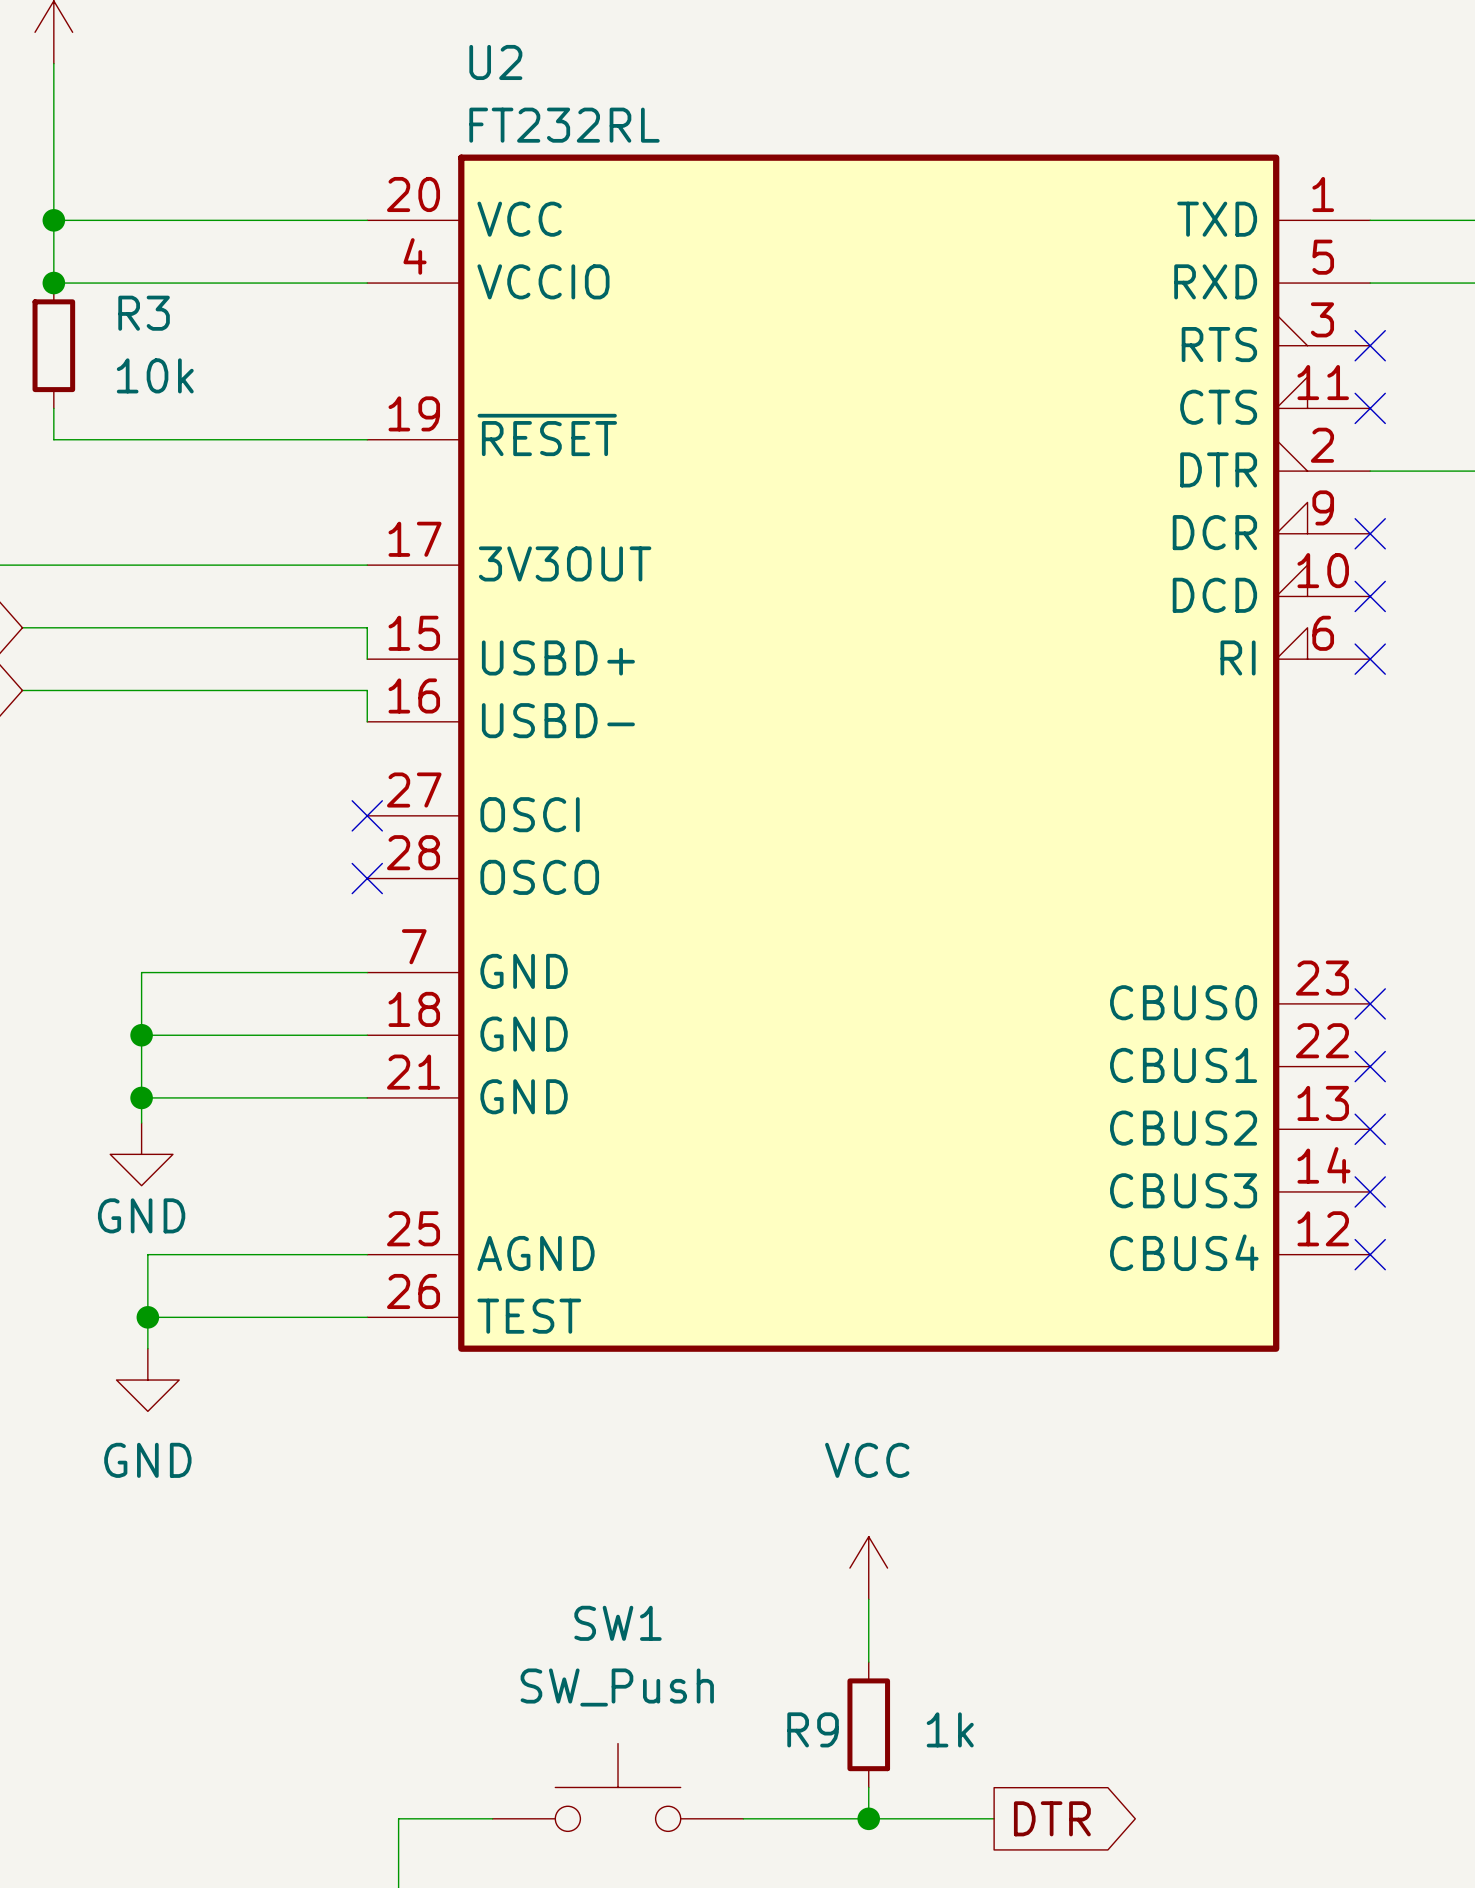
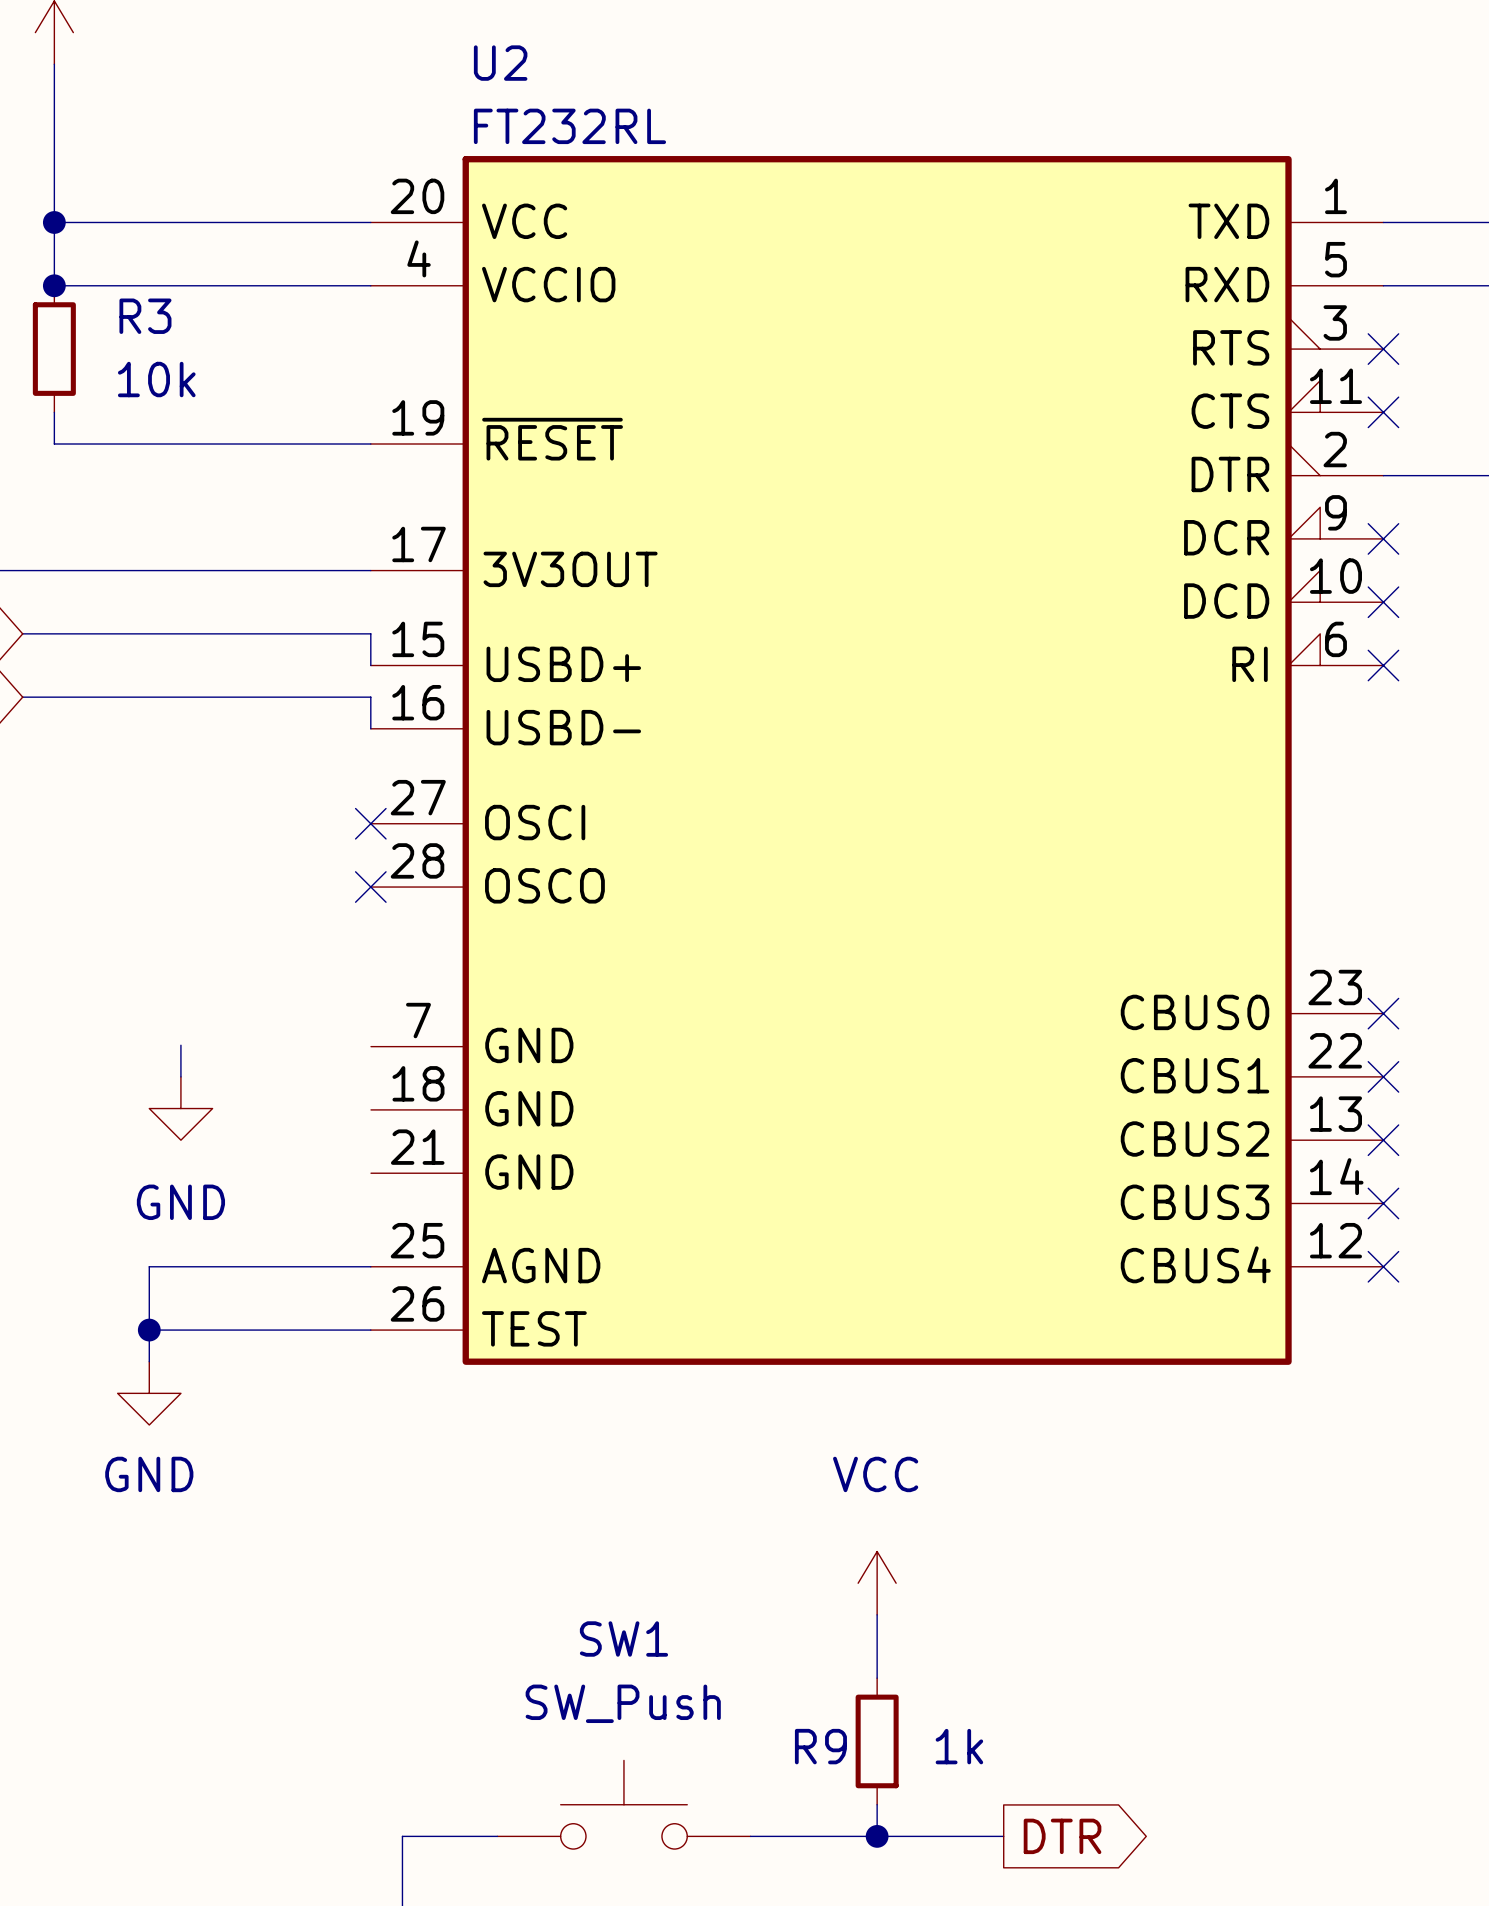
U2 symbol: [367, 154, 1371, 1352] -> [370, 156, 1384, 1365]
wire: (367, 972) (141, 972) (141, 1123) -> none
wire: (141, 1035) (367, 1035) -> none
junction: (141, 1035) -> none
wire: none -> (180, 1045) (180, 1076)
wire: (141, 1097) (367, 1097) -> none
junction: (141, 1097) -> none
power symbol position: GND (141, 1154) -> GND (180, 1108)
power symbol text position: GND (141, 1215) -> GND (180, 1202)

